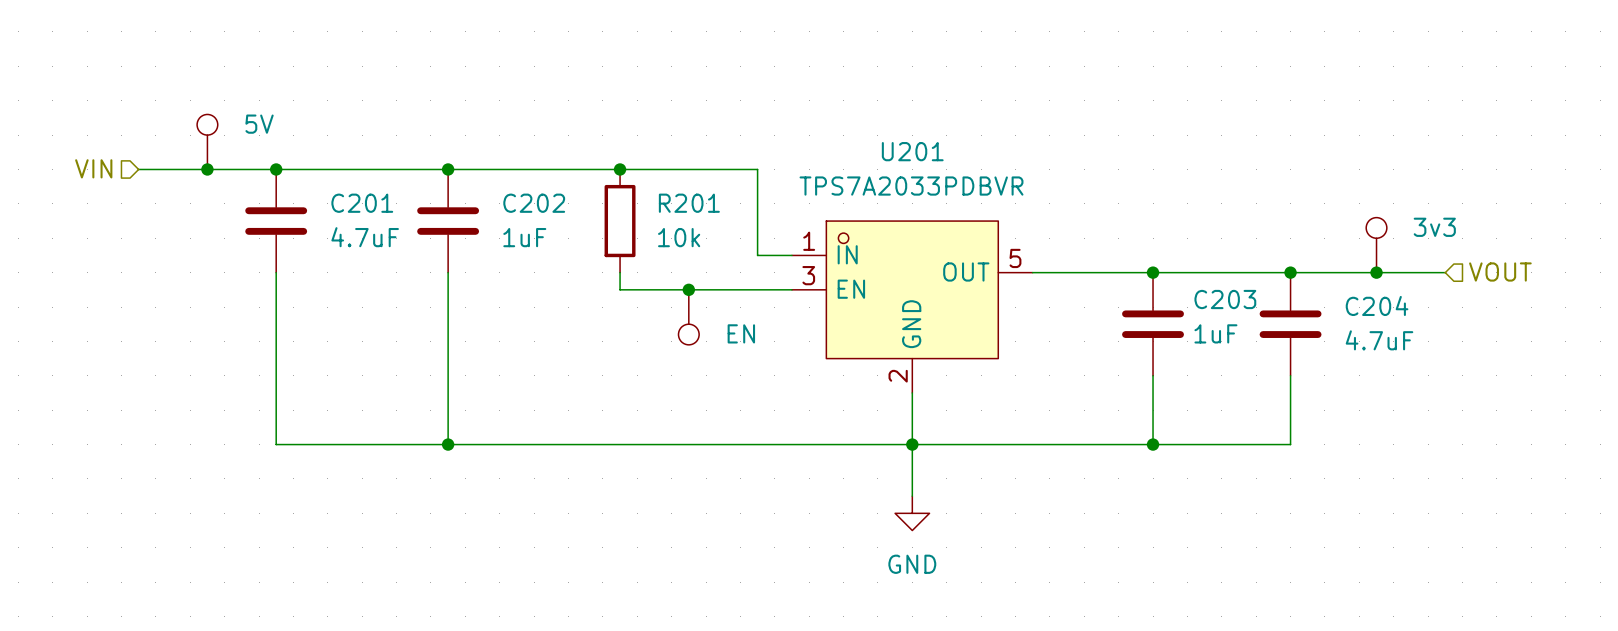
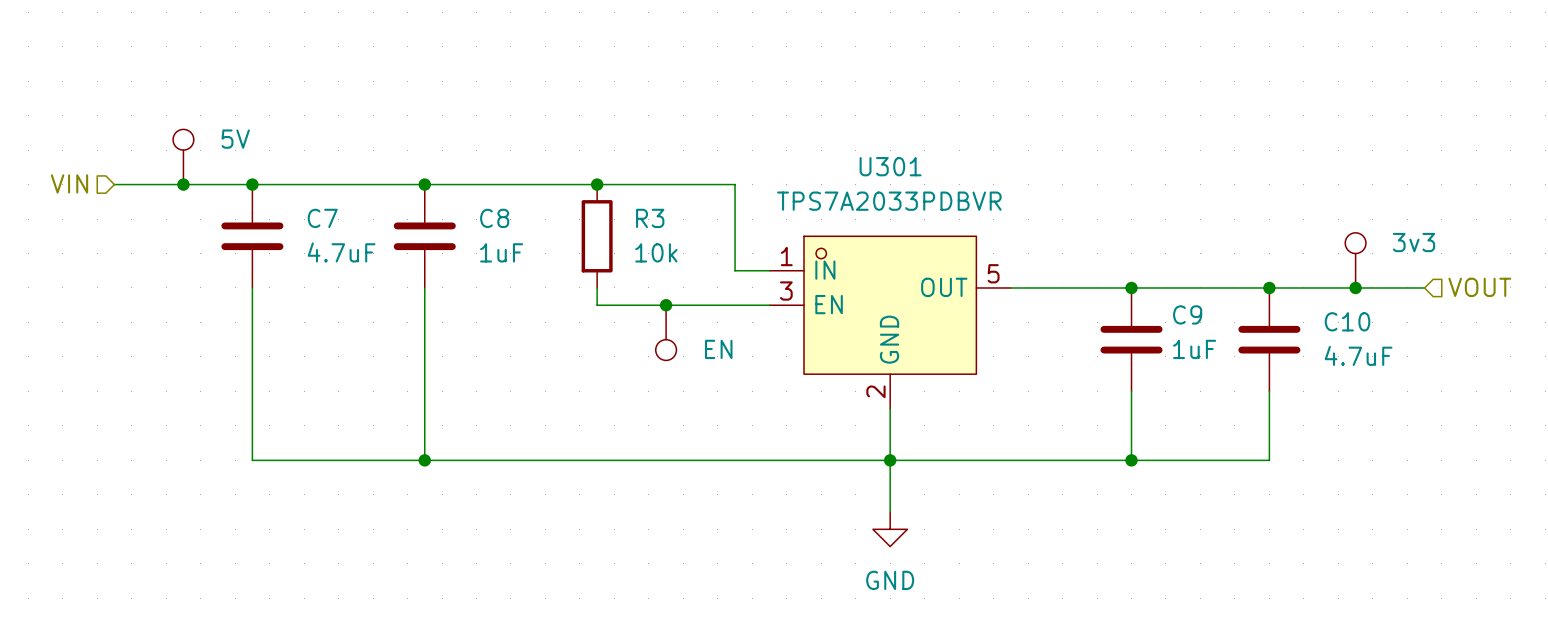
U201 name: U201 (912, 151) -> U301 (890, 166)
C201 name: C201 (362, 203) -> C7 (322, 218)
C202 name: C202 (534, 203) -> C8 (494, 218)
R201 name: R201 (689, 203) -> R3 (650, 218)
C203 name: C203 (1225, 299) -> C9 (1187, 314)
C204 name: C204 (1377, 305) -> C10 (1347, 321)

